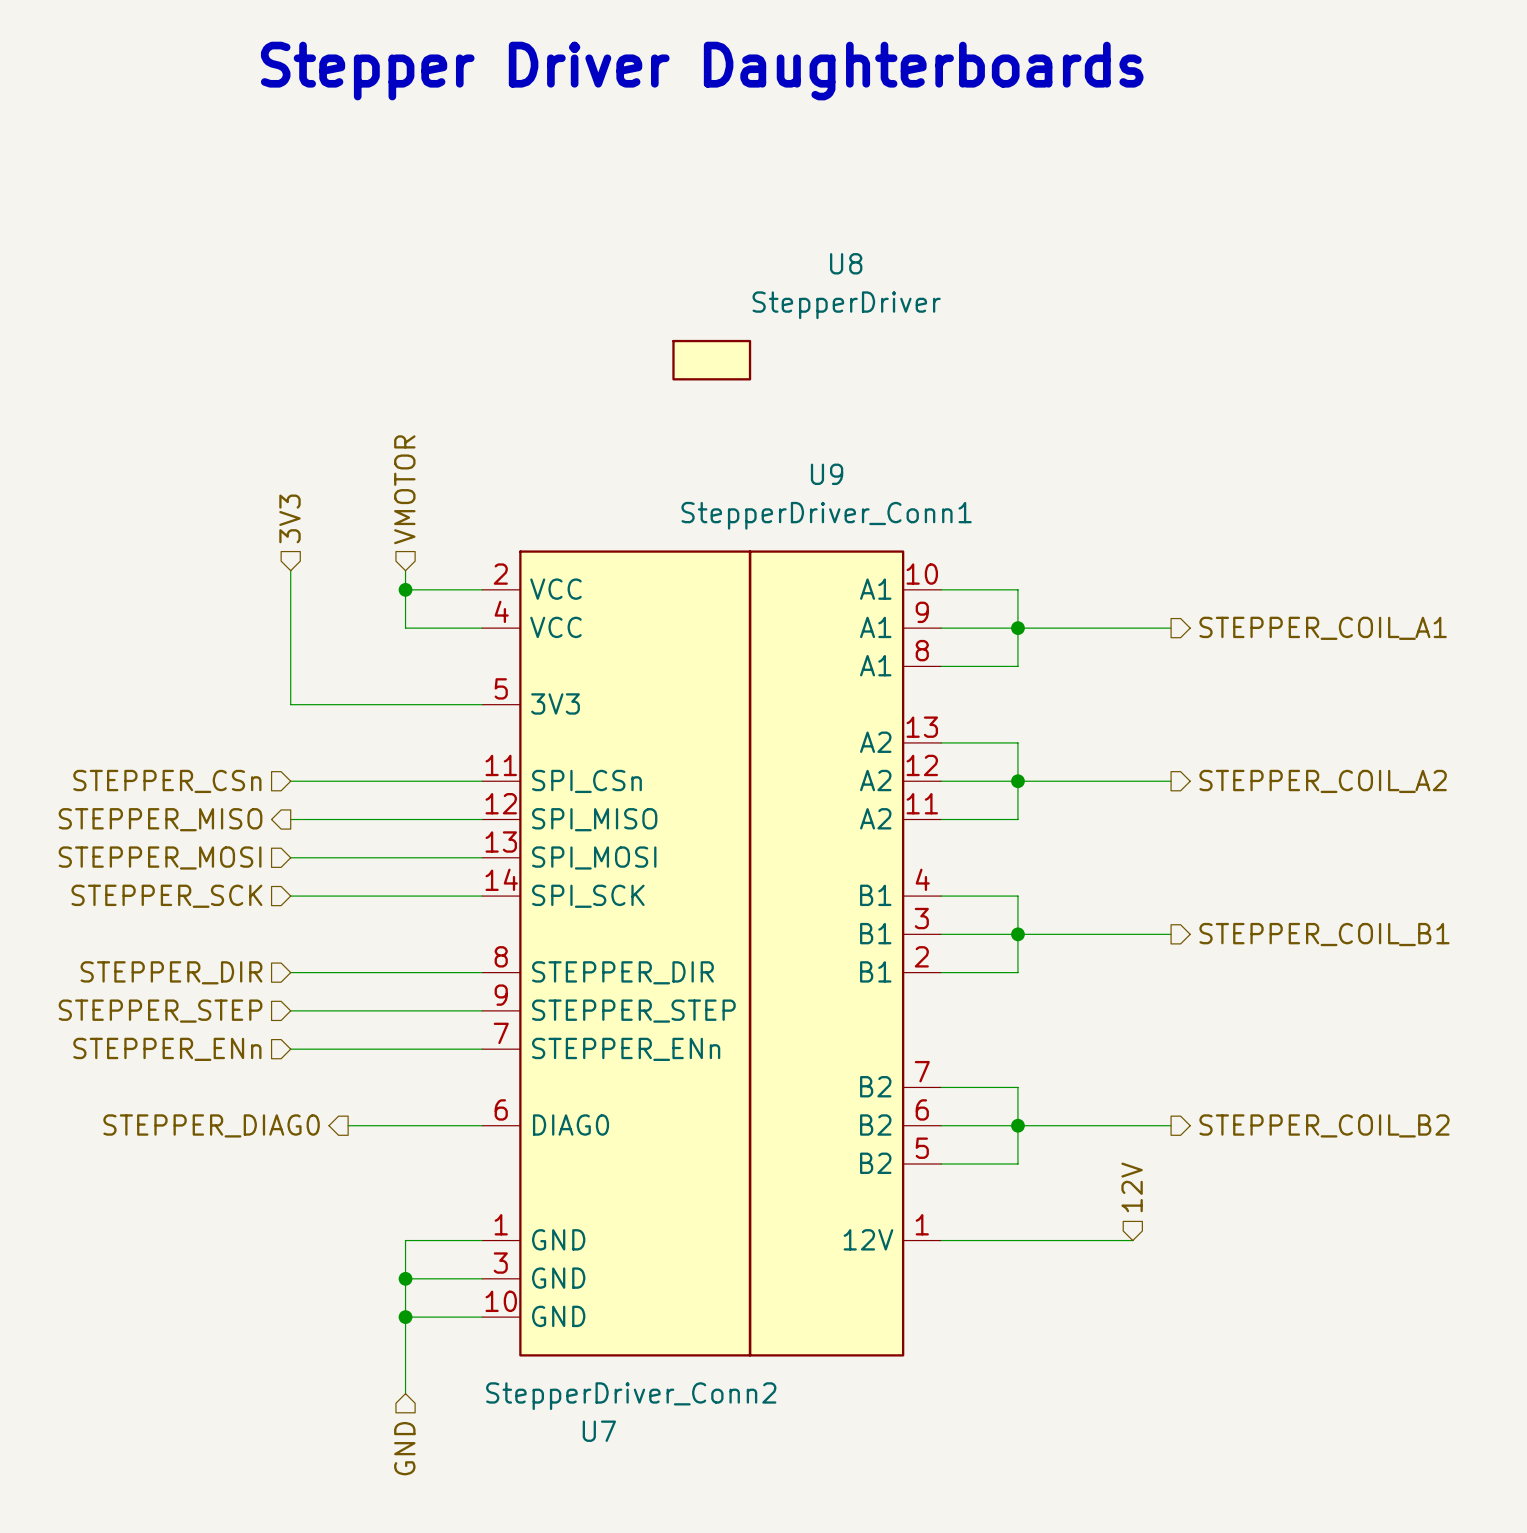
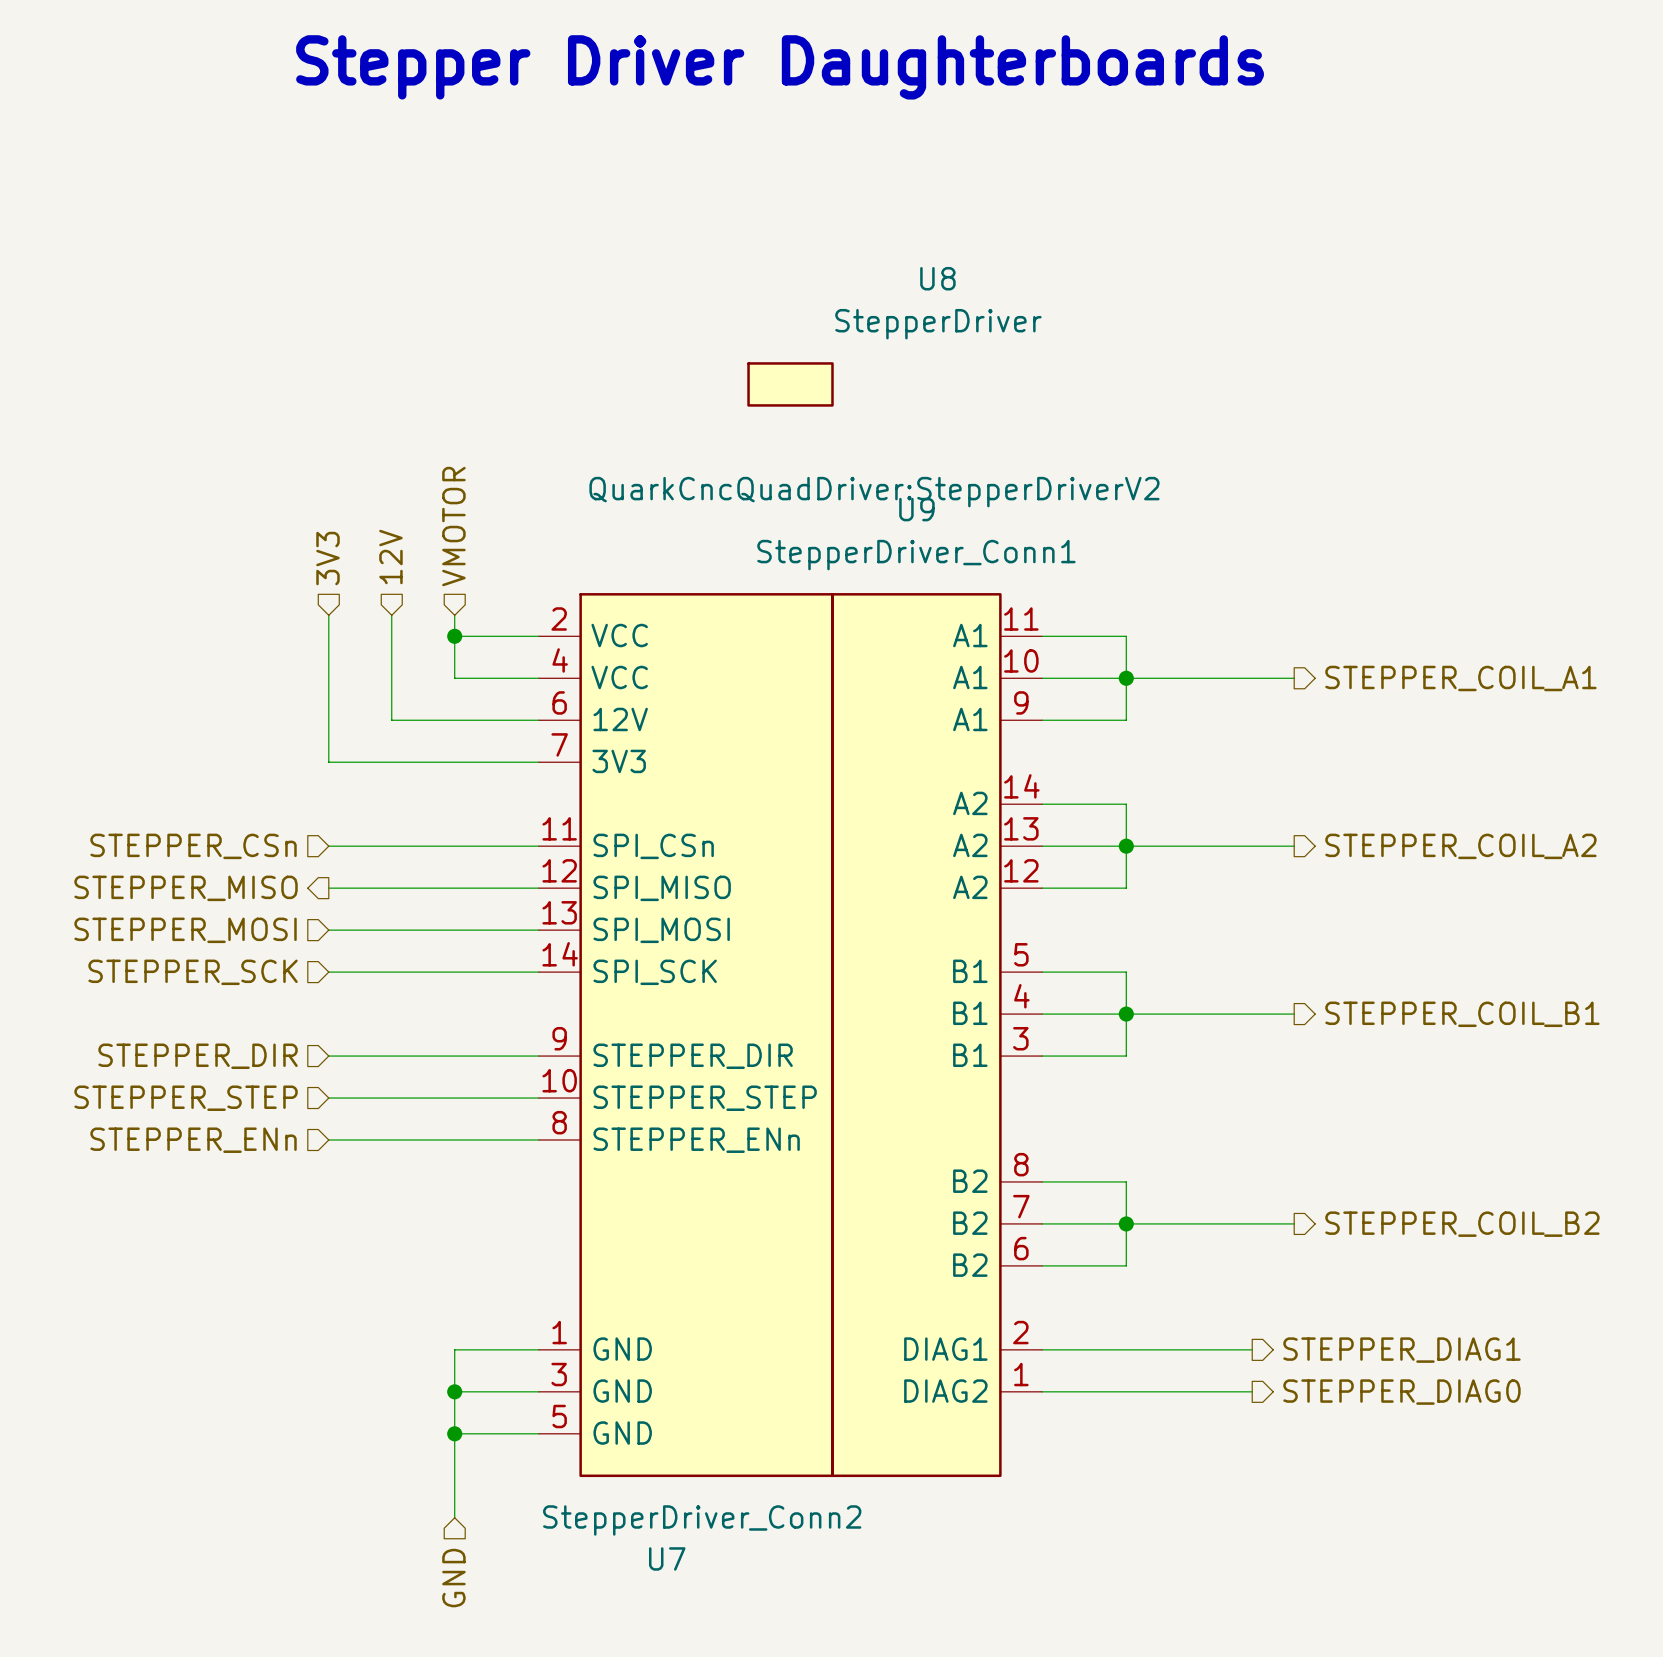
U8 text: none -> QuarkCncQuadDriver:StepperDriverV2 (874, 492)
hierarchical label: none -> 12V (390, 557)
U7 symbol: [482, 550, 752, 1357] -> [538, 593, 834, 1478]
U9 symbol: [748, 550, 942, 1357] -> [831, 593, 1043, 1478]
wire: none -> (391, 615) (391, 720) (538, 720)
hierarchical label: STEPPER_DIAG0 (211, 1125) -> none
wire: (348, 1125) (482, 1125) -> none
hierarchical label: 12V (1132, 1187) -> none
hierarchical label: none -> STEPPER_DIAG1 (1401, 1350)
wire: none -> (1042, 1391) (1252, 1391)
hierarchical label: none -> STEPPER_DIAG0 (1401, 1392)

